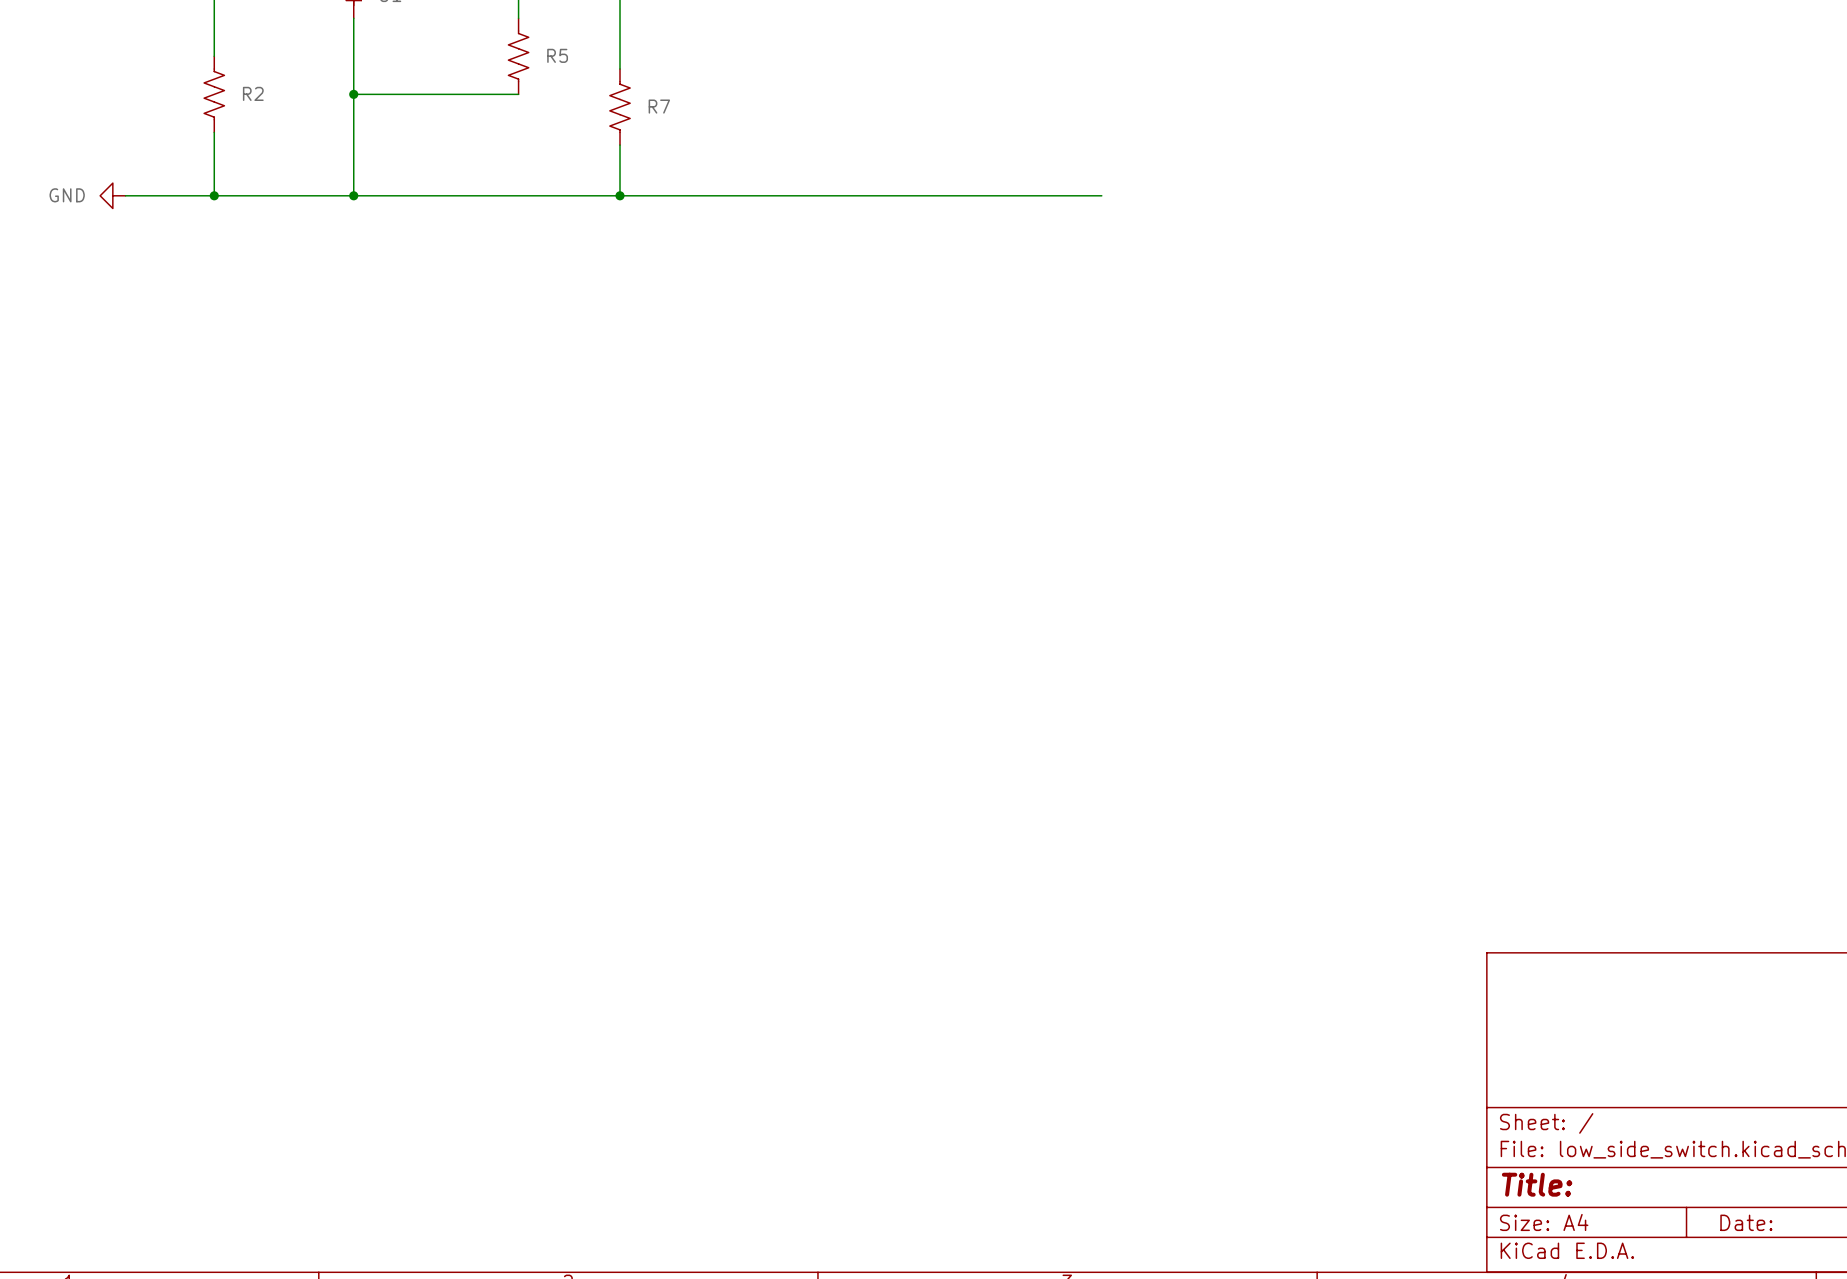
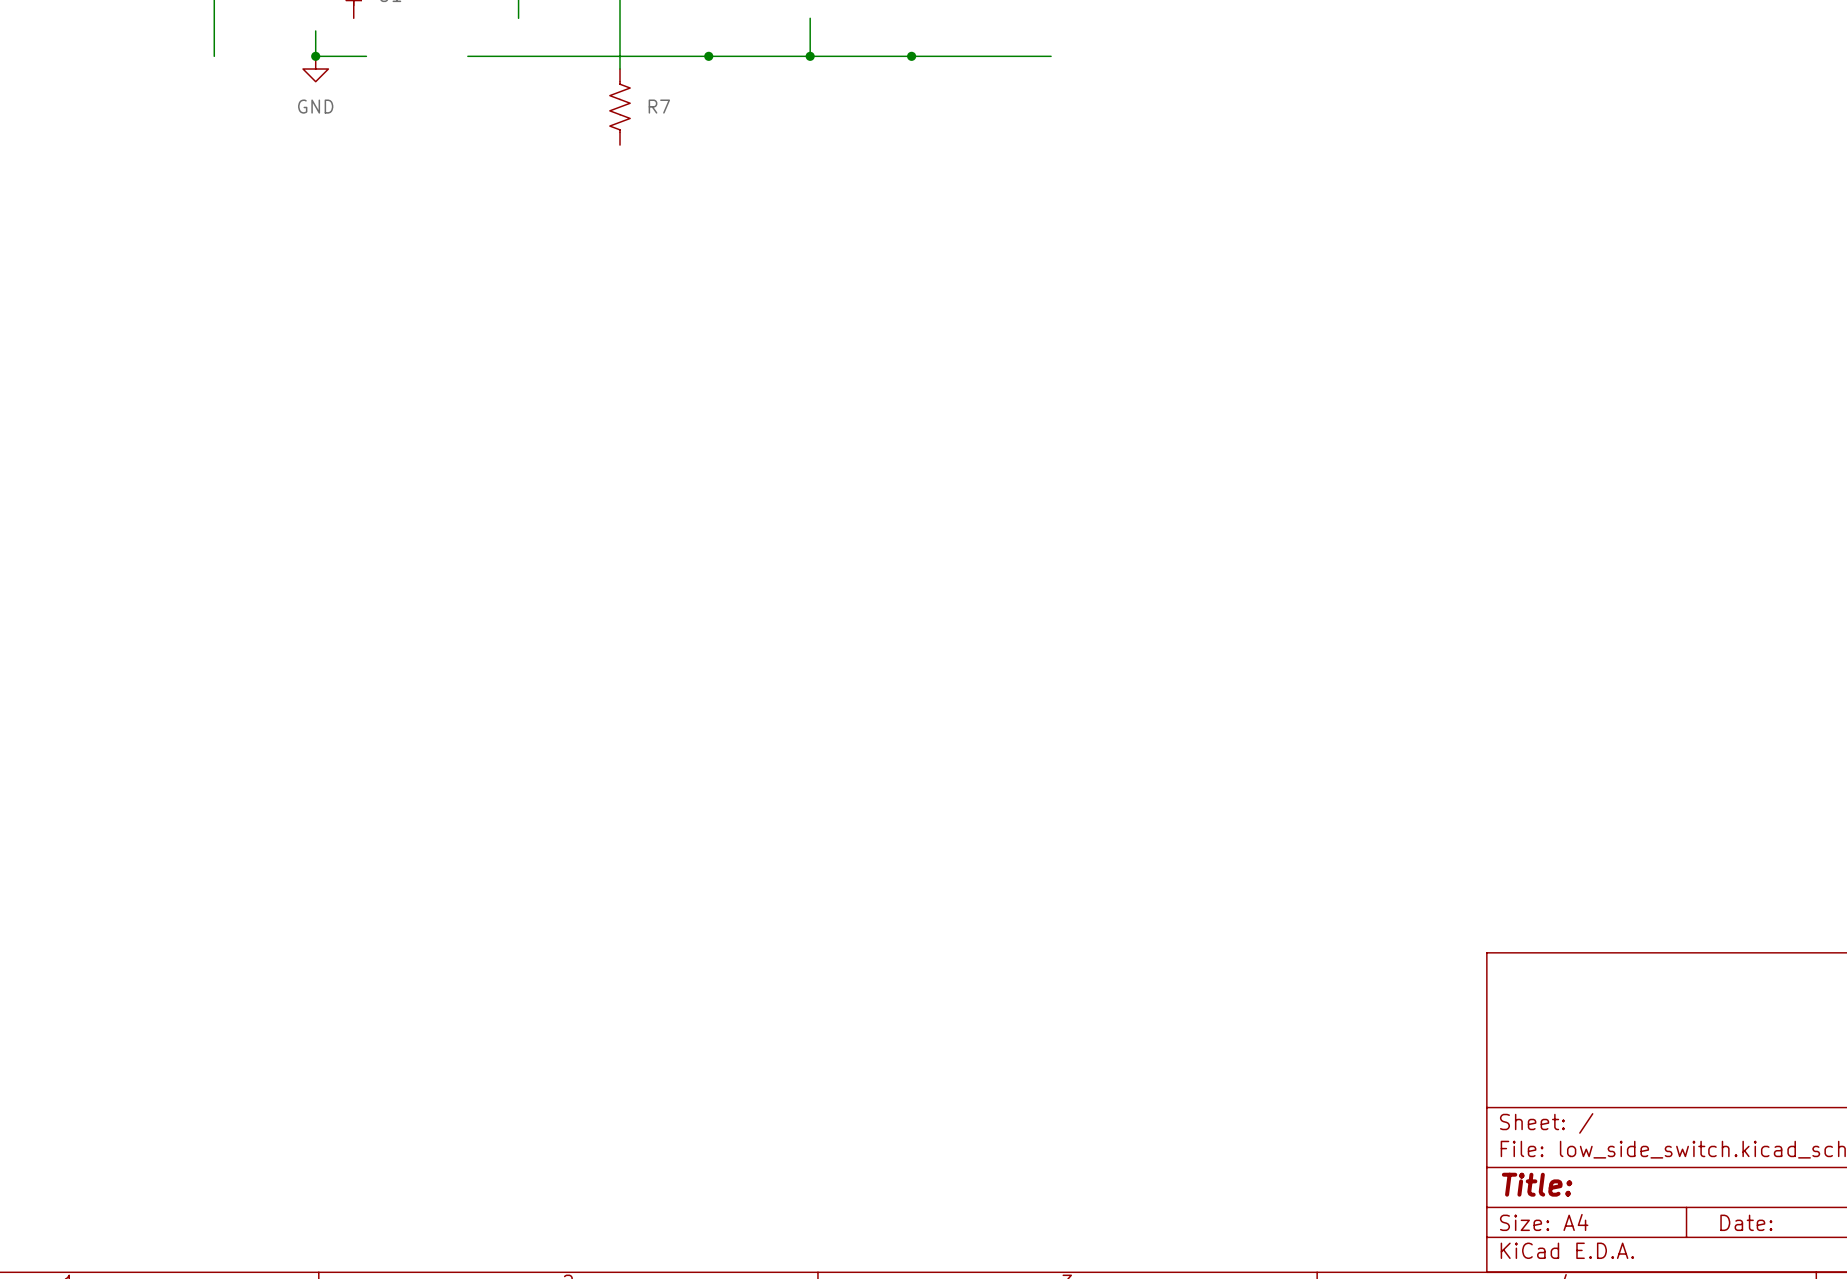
wire: (353, 18) (353, 195) -> none
wire: none -> (810, 18) (810, 56)
wire: none -> (315, 30) (315, 56) (366, 56)
wire: none -> (467, 56) (1051, 56)
R5: (518, 56) -> none
junction: none -> (708, 56)
junction: none -> (810, 56)
junction: none -> (911, 56)
R2: (214, 94) -> none
wire: (353, 94) (518, 94) -> none
junction position: (353, 94) -> (315, 56)
wire: (214, 132) (214, 195) -> none
wire: (620, 145) (620, 195) -> none
power symbol rotation: 0° (112, 195) -> 90° counterclockwise (315, 69)
power symbol position: GND (112, 195) -> GND (315, 69)
wire: (125, 195) (1101, 195) -> none
junction: (214, 195) -> none
junction: (353, 195) -> none
junction: (620, 195) -> none

